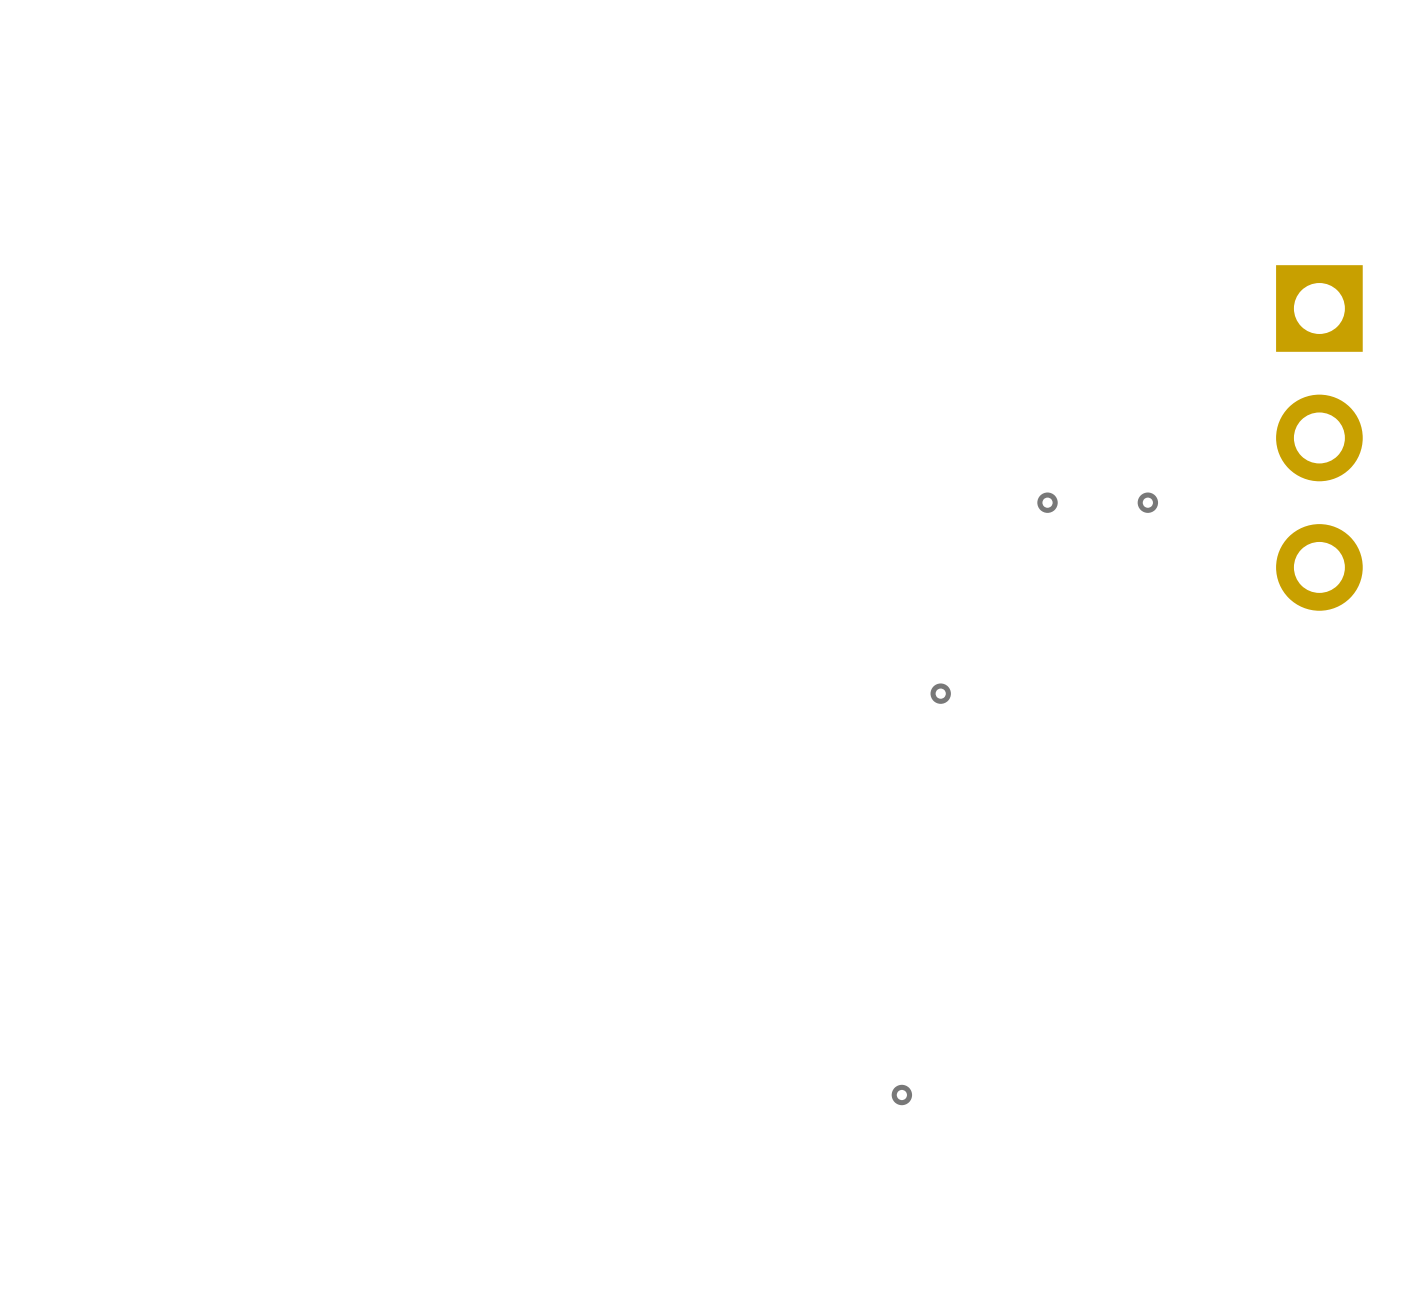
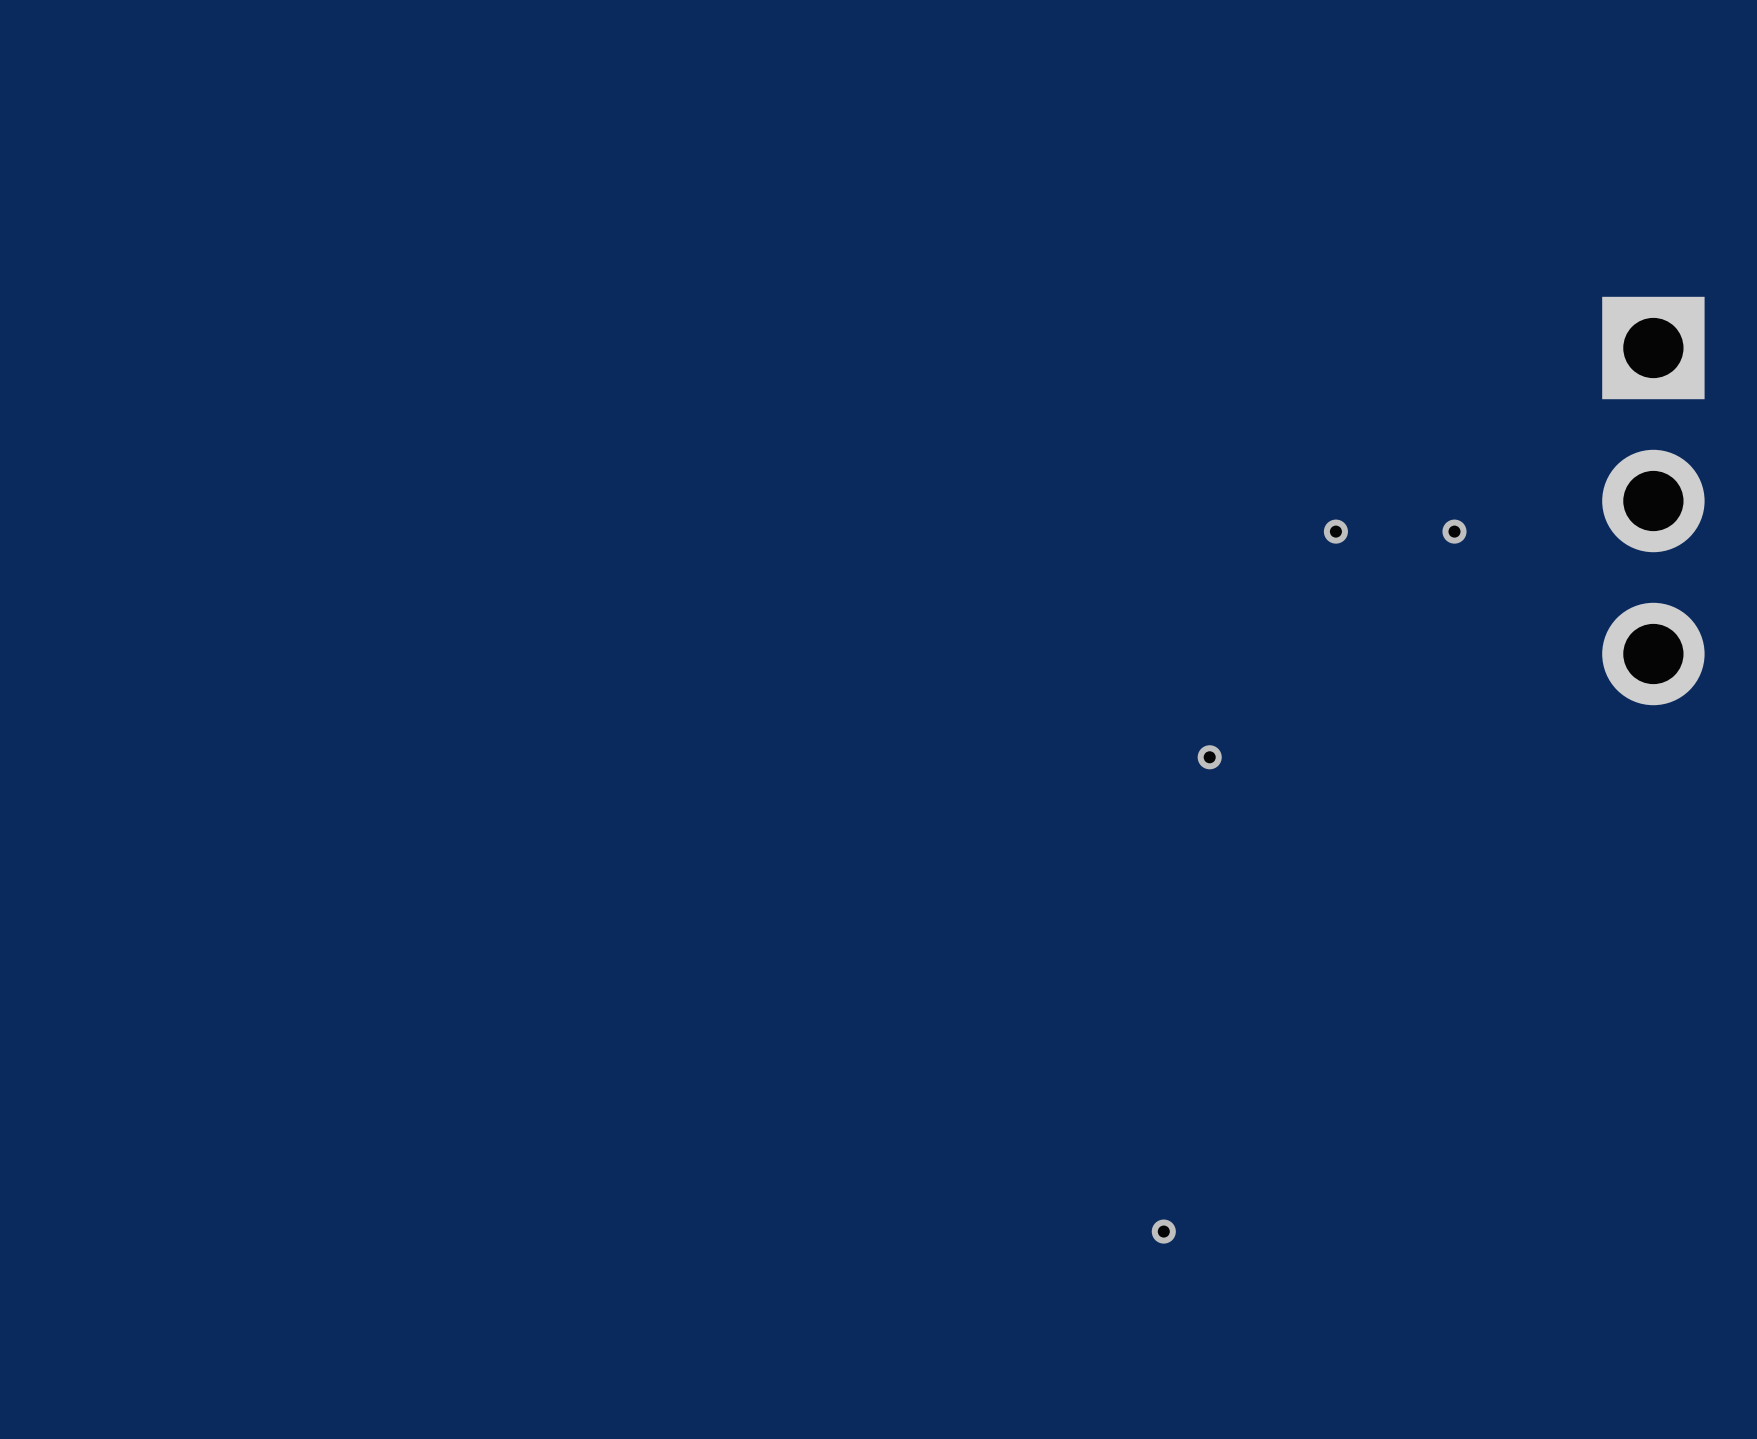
part position: (1319, 437) -> (1653, 501)

